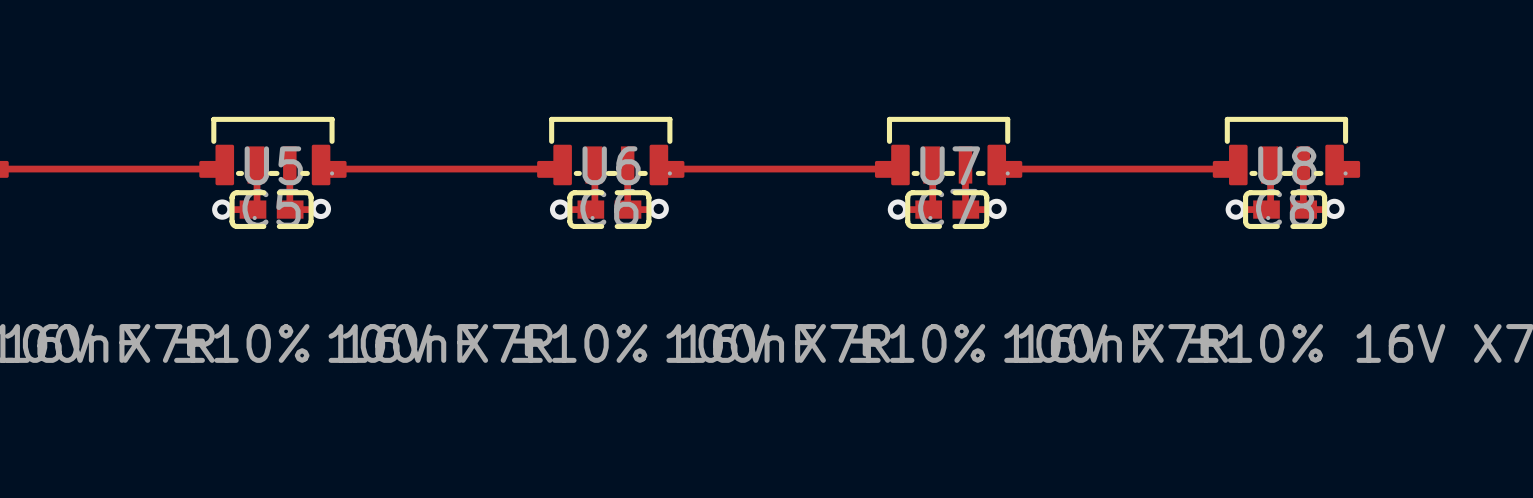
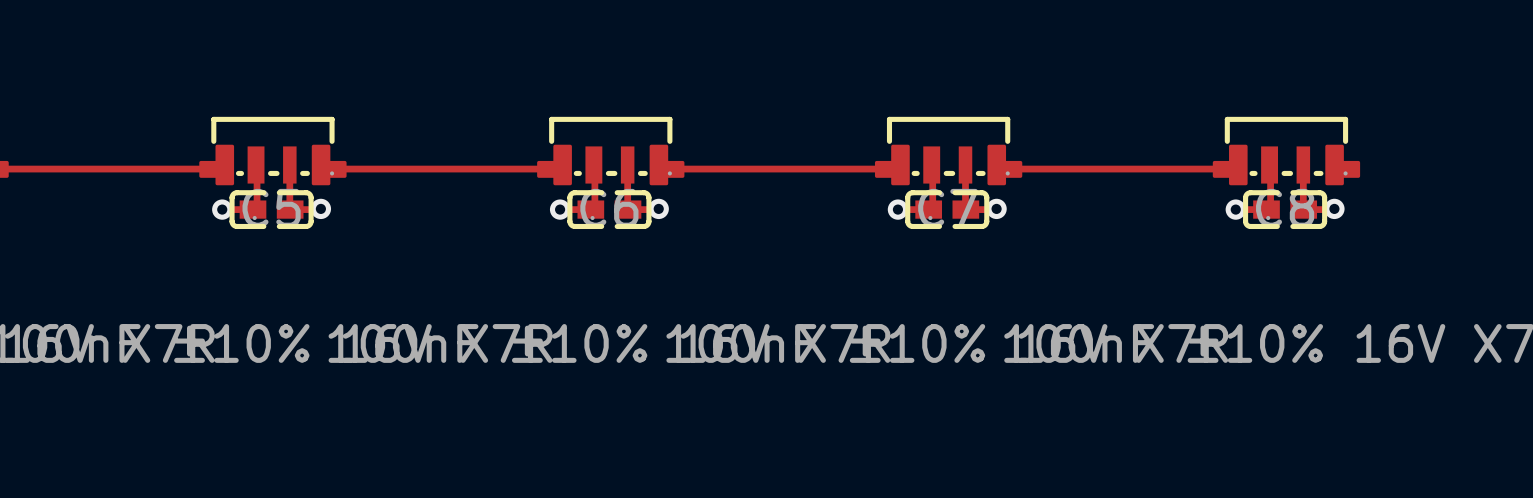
U5 name: U5 (273, 165) -> none
U6 name: U6 (611, 165) -> none
U7 name: U7 (950, 165) -> none
U8 name: U8 (1287, 165) -> none

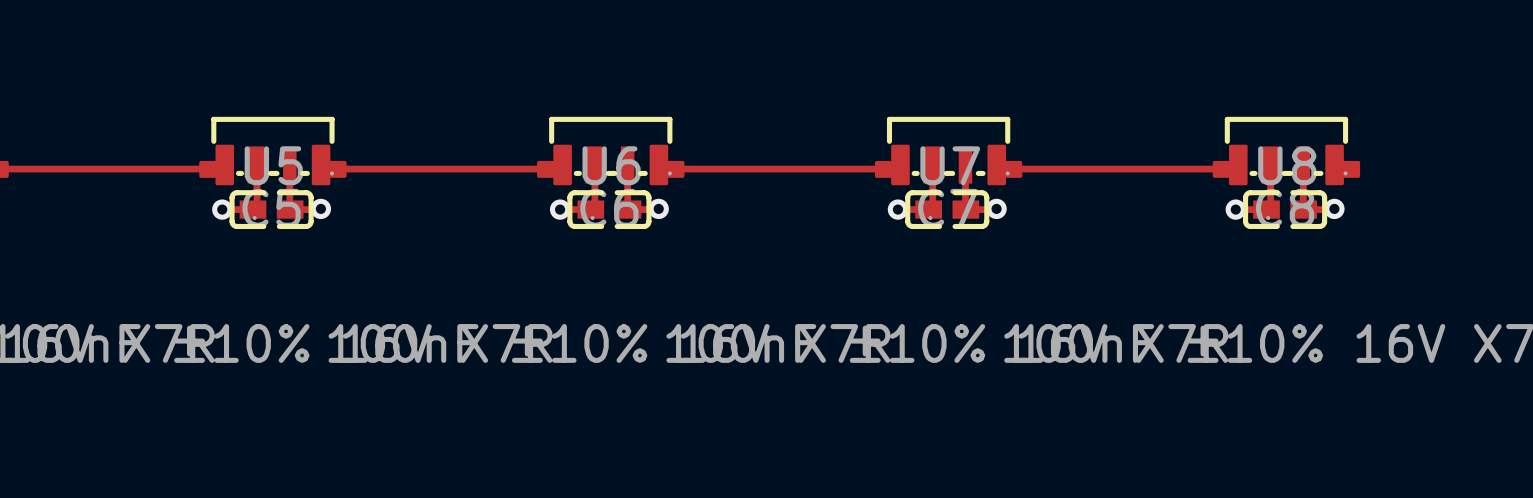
U5 name: none -> U5 (273, 165)
U6 name: none -> U6 (611, 165)
U7 name: none -> U7 (950, 165)
U8 name: none -> U8 (1287, 165)

